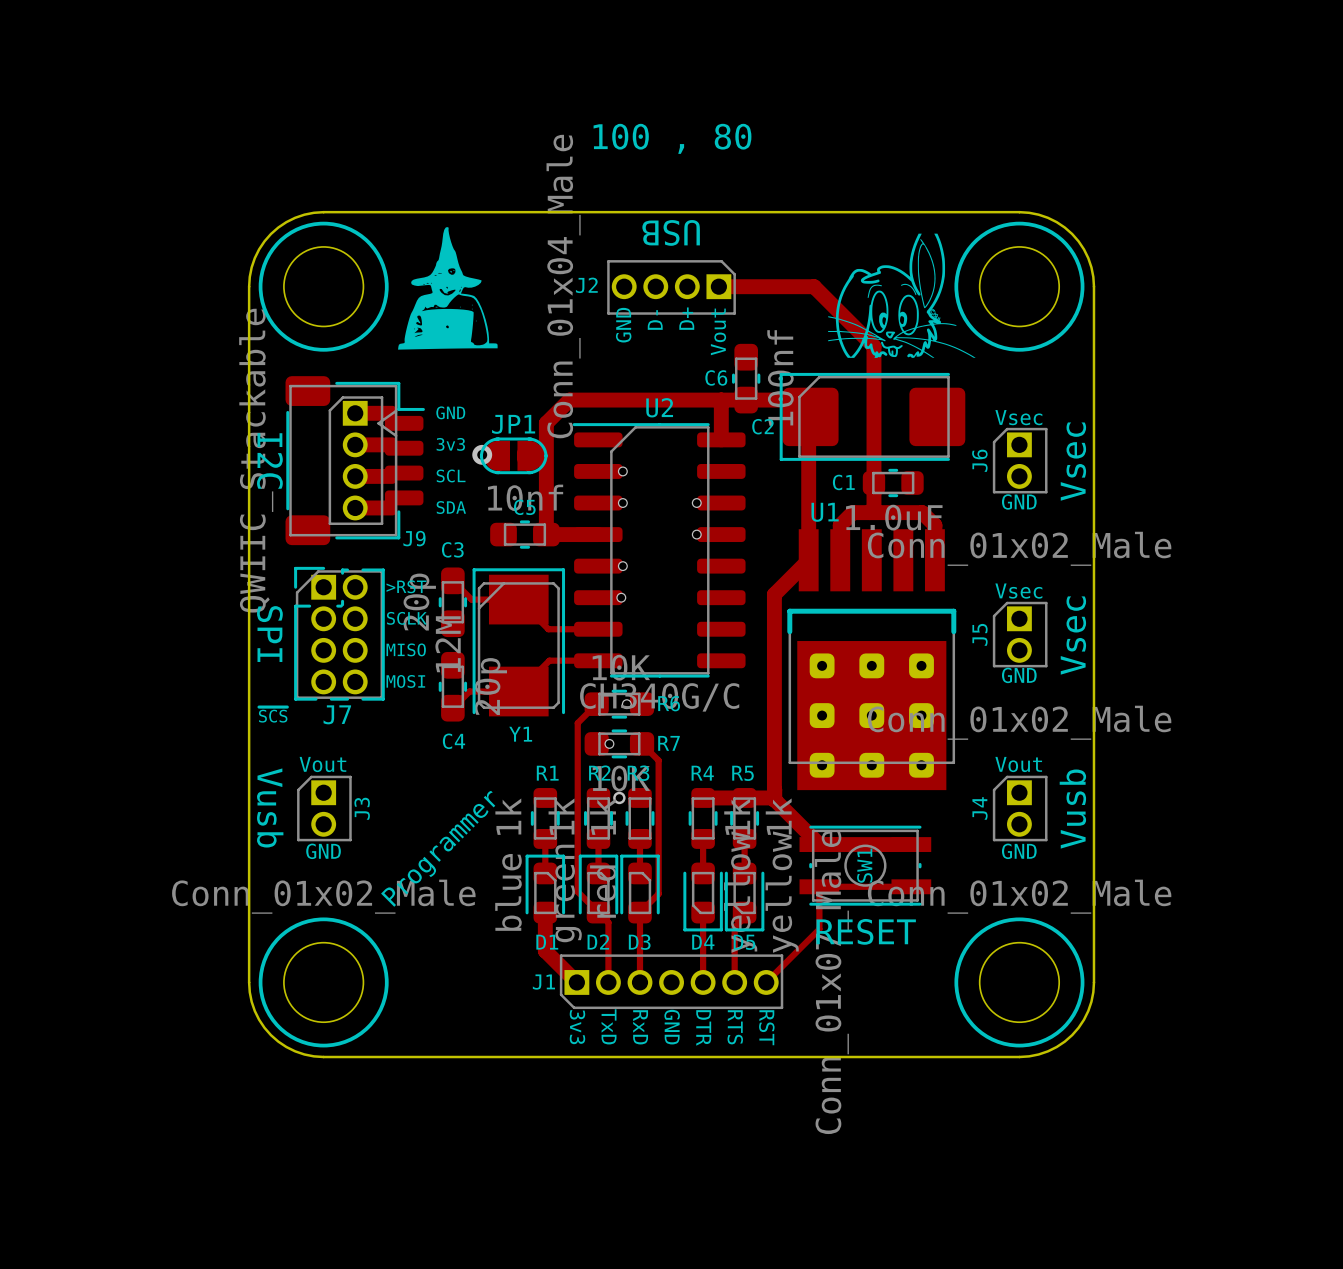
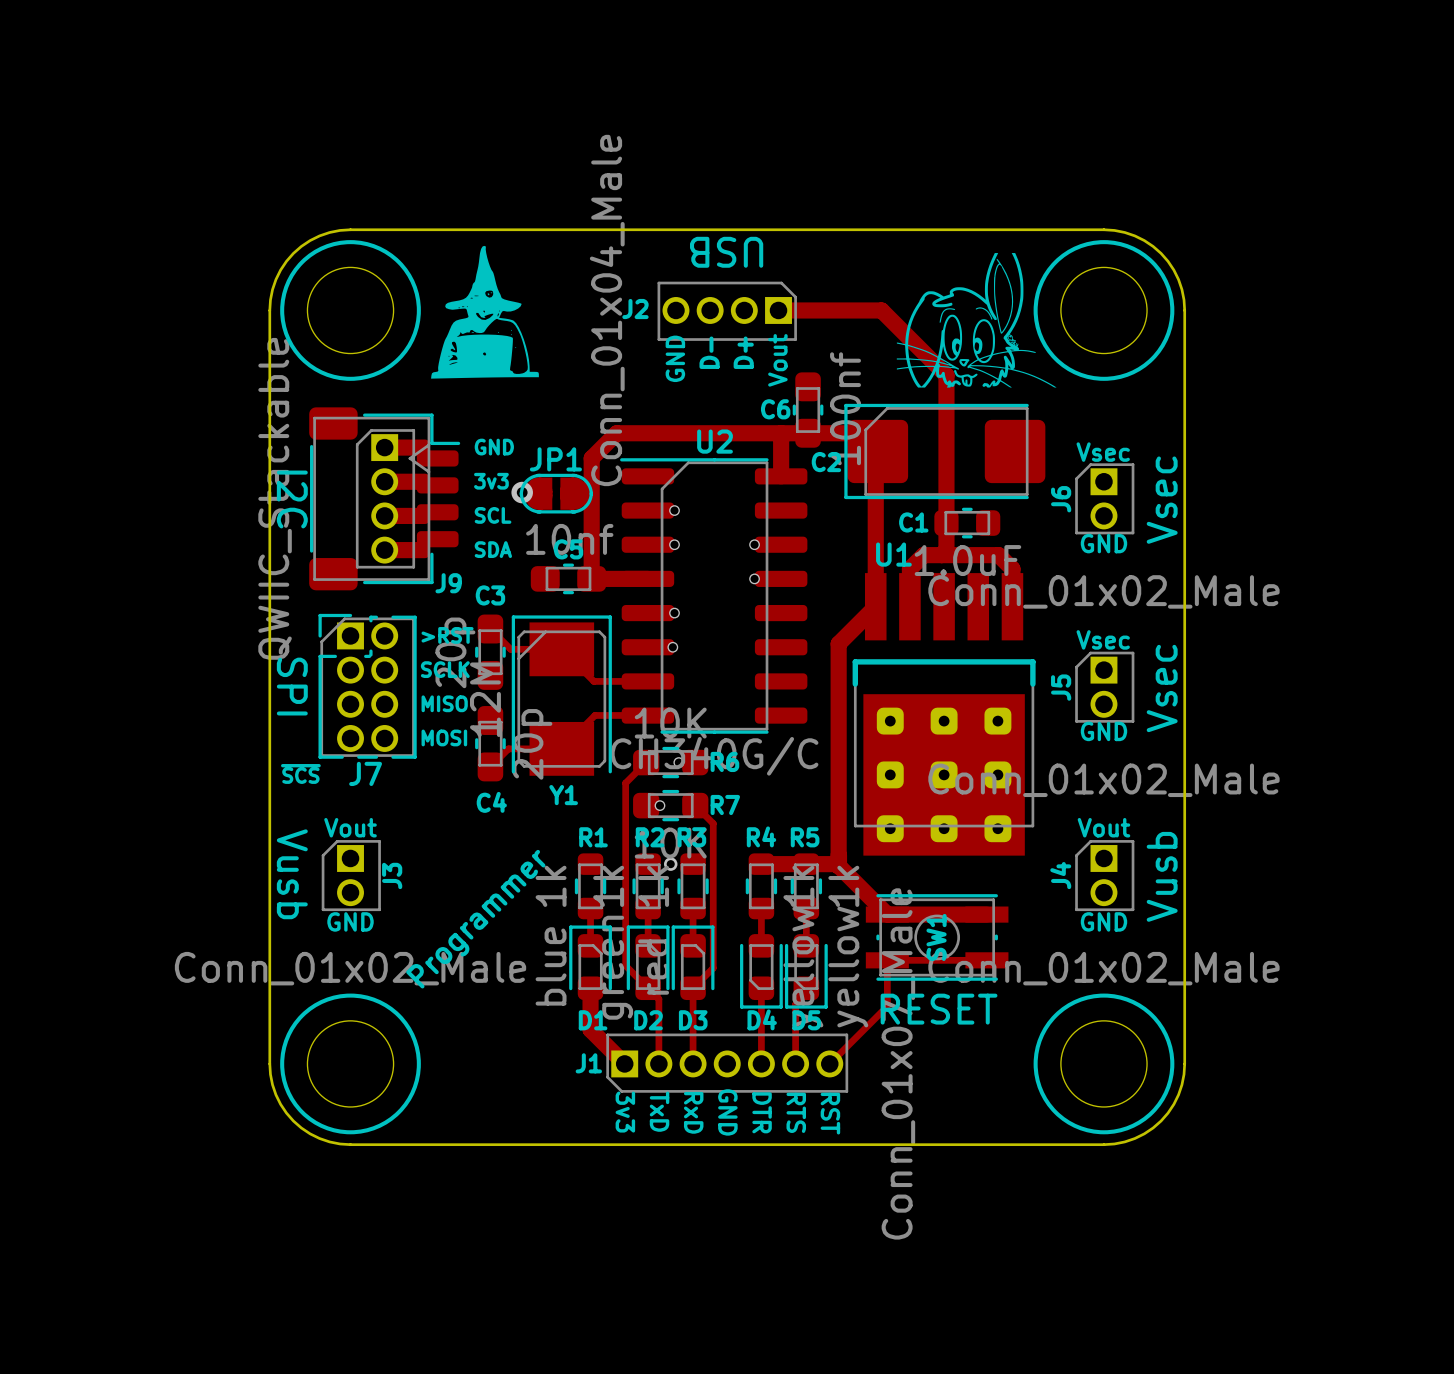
text: 100 , 80 (672, 138) -> none

